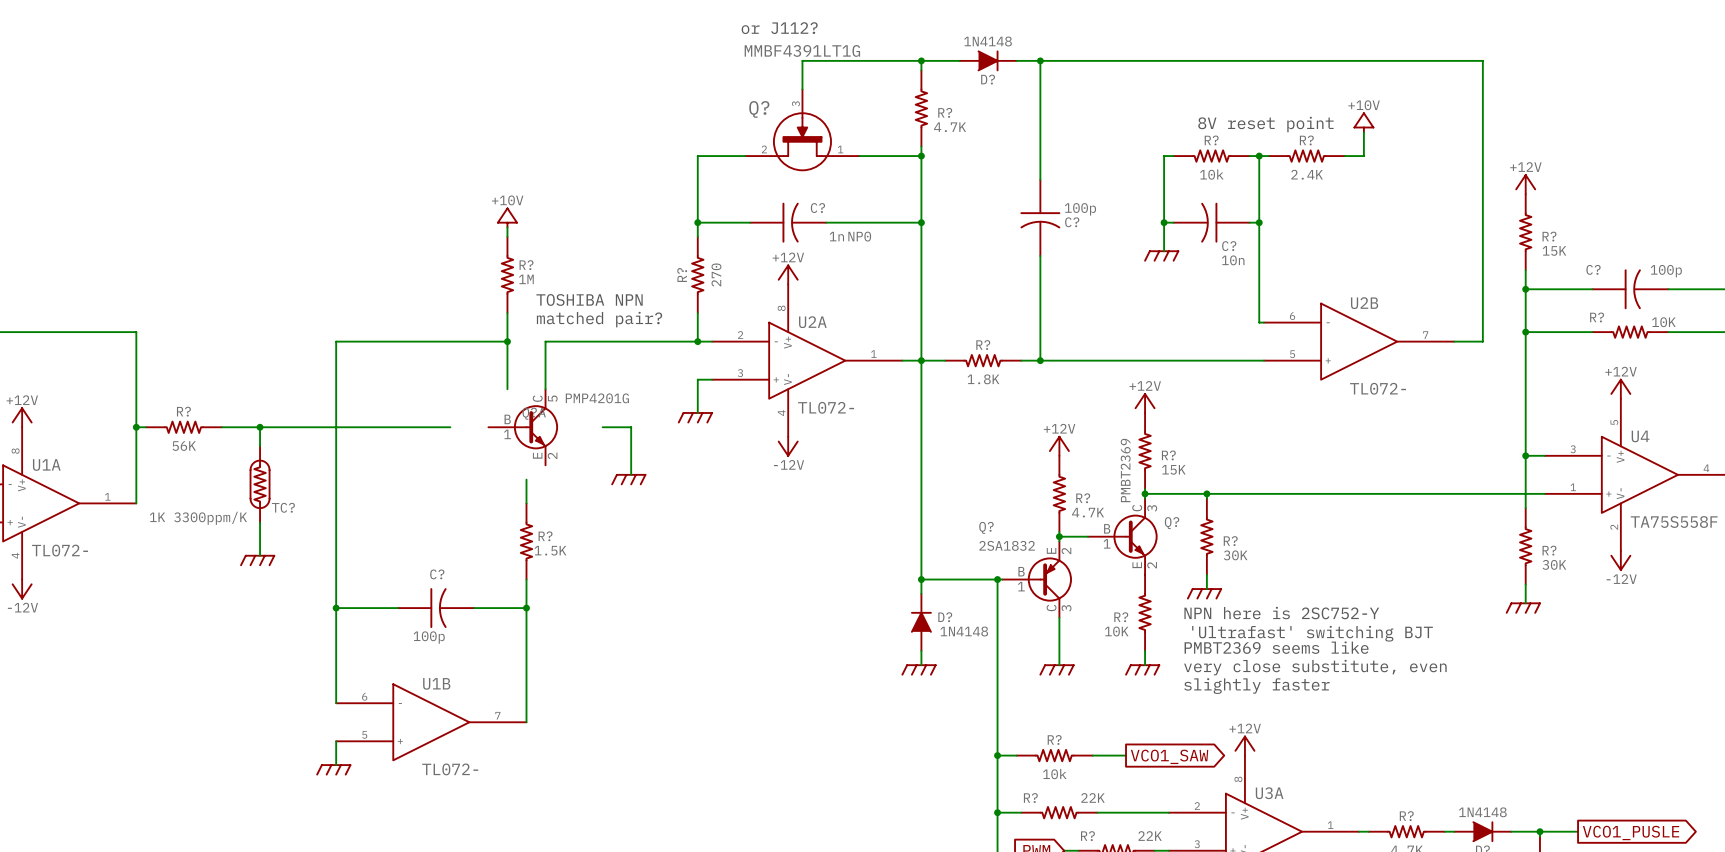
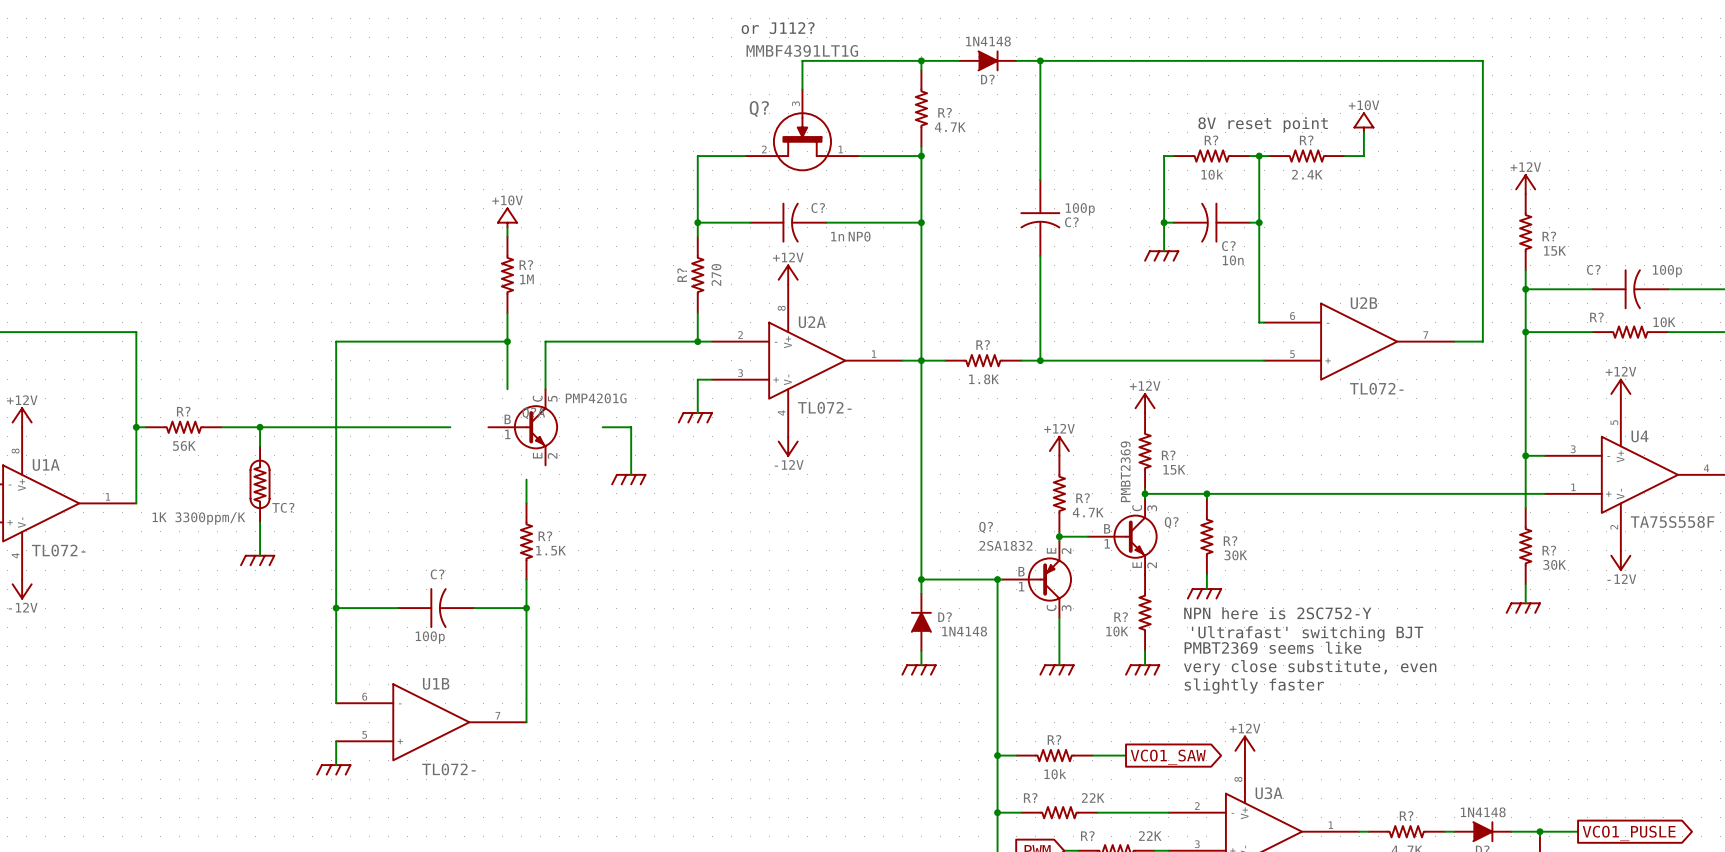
text: TOSHIBA NPN (589, 299) -> none
text: matched pair? (599, 319) -> none

